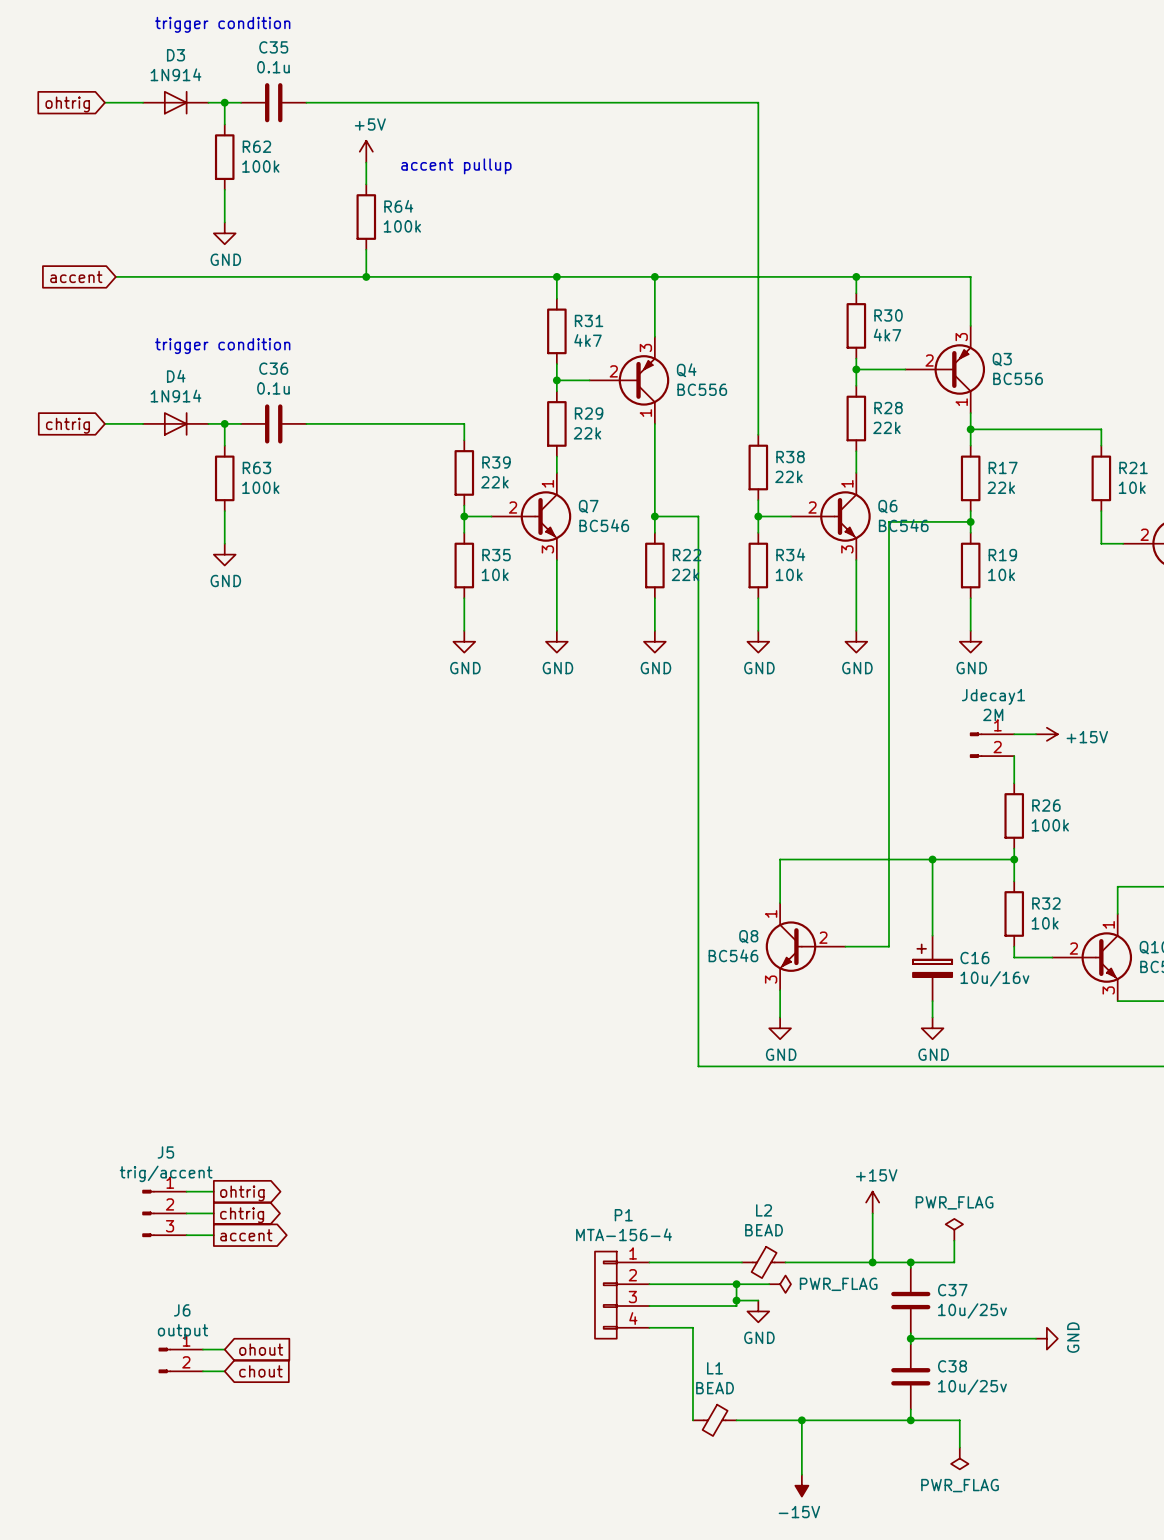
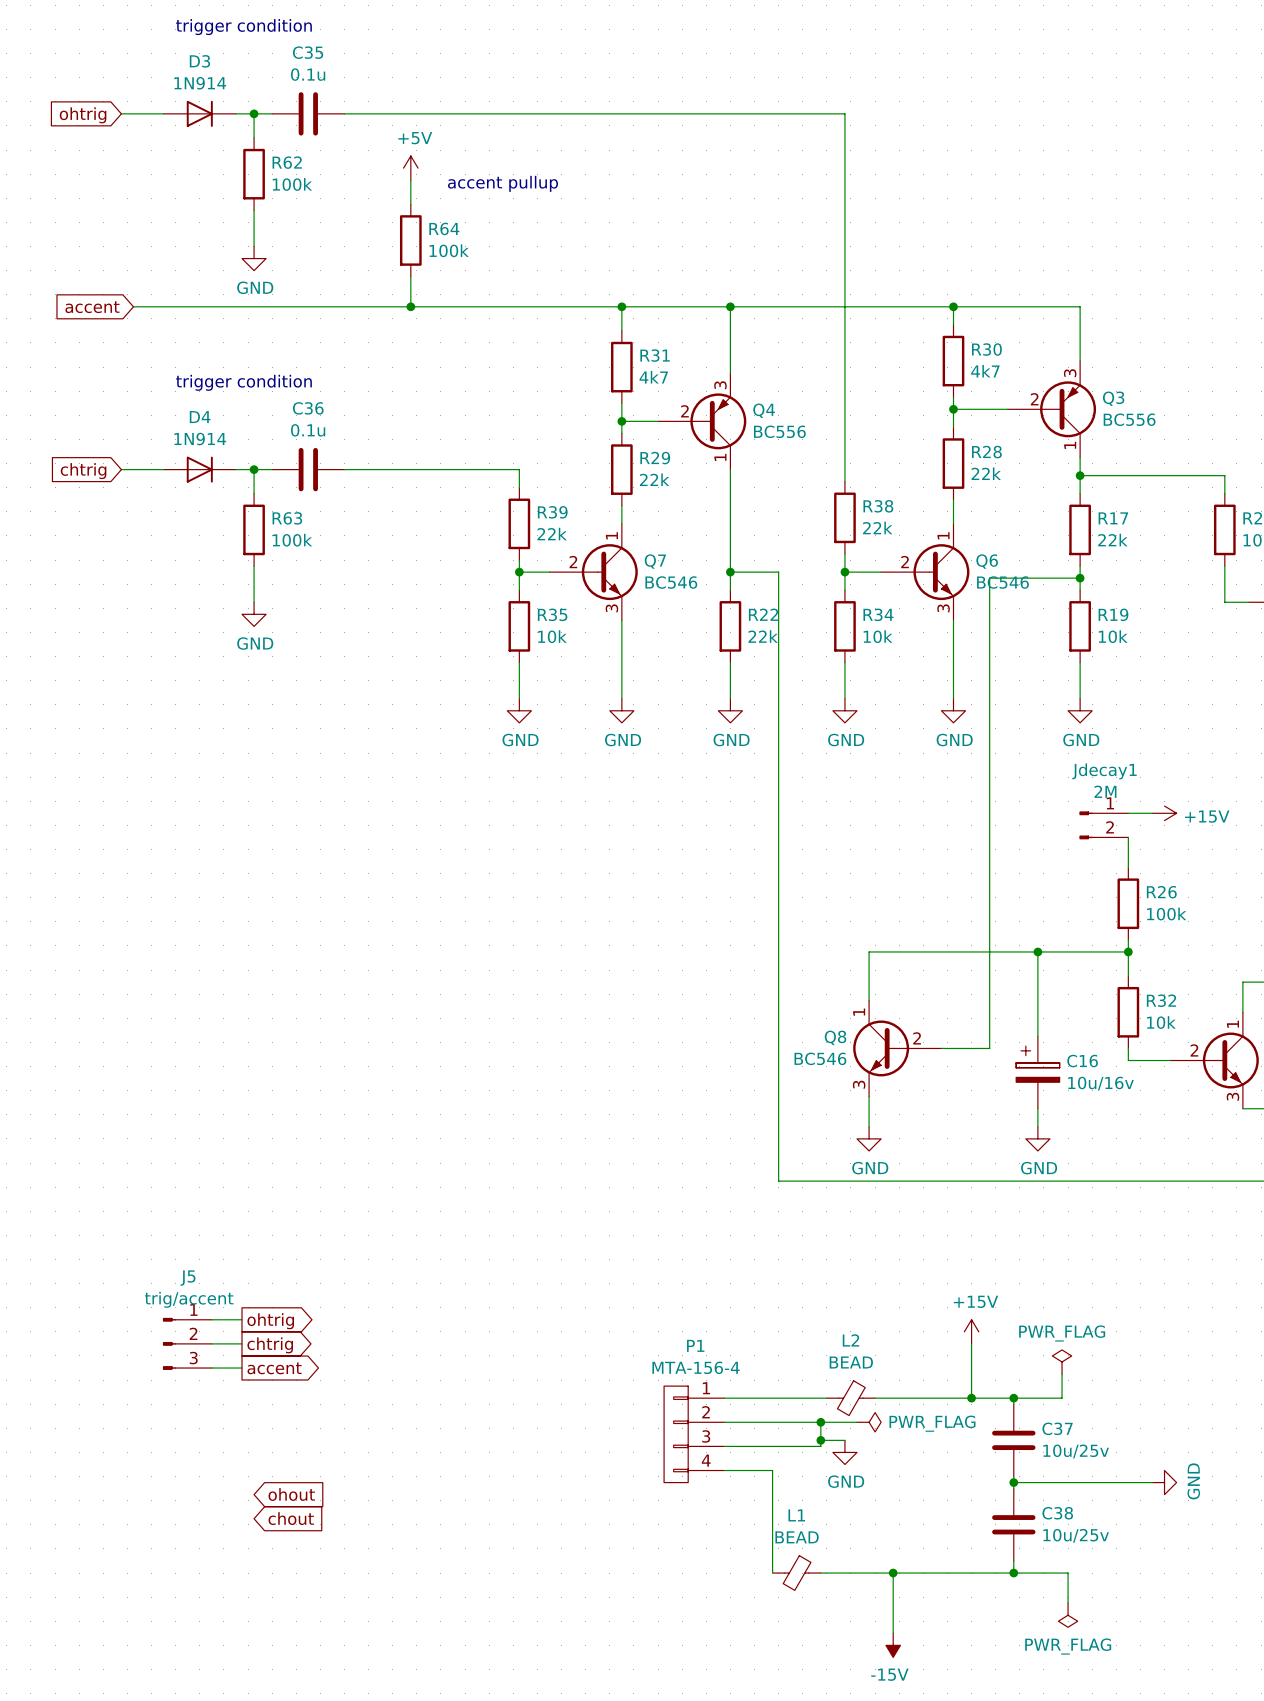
wire: (202, 1349) (224, 1349) -> none
J6: output (180, 1360) -> none
wire: (202, 1371) (224, 1371) -> none

